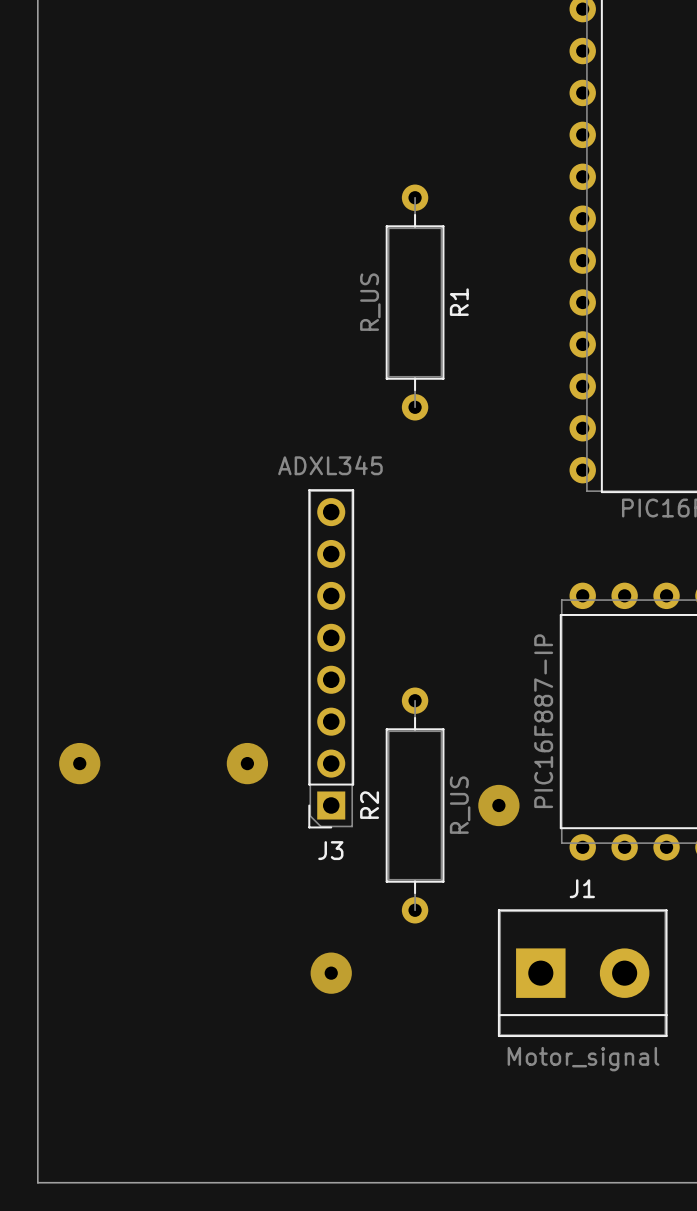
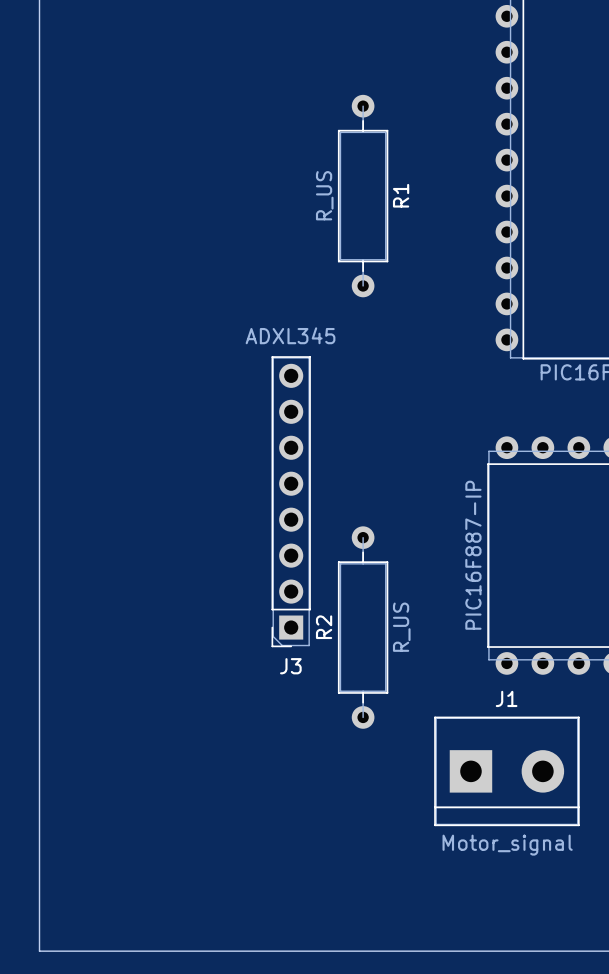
via: (79, 763) -> none
via: (247, 763) -> none
via: (498, 805) -> none
via: (331, 973) -> none

